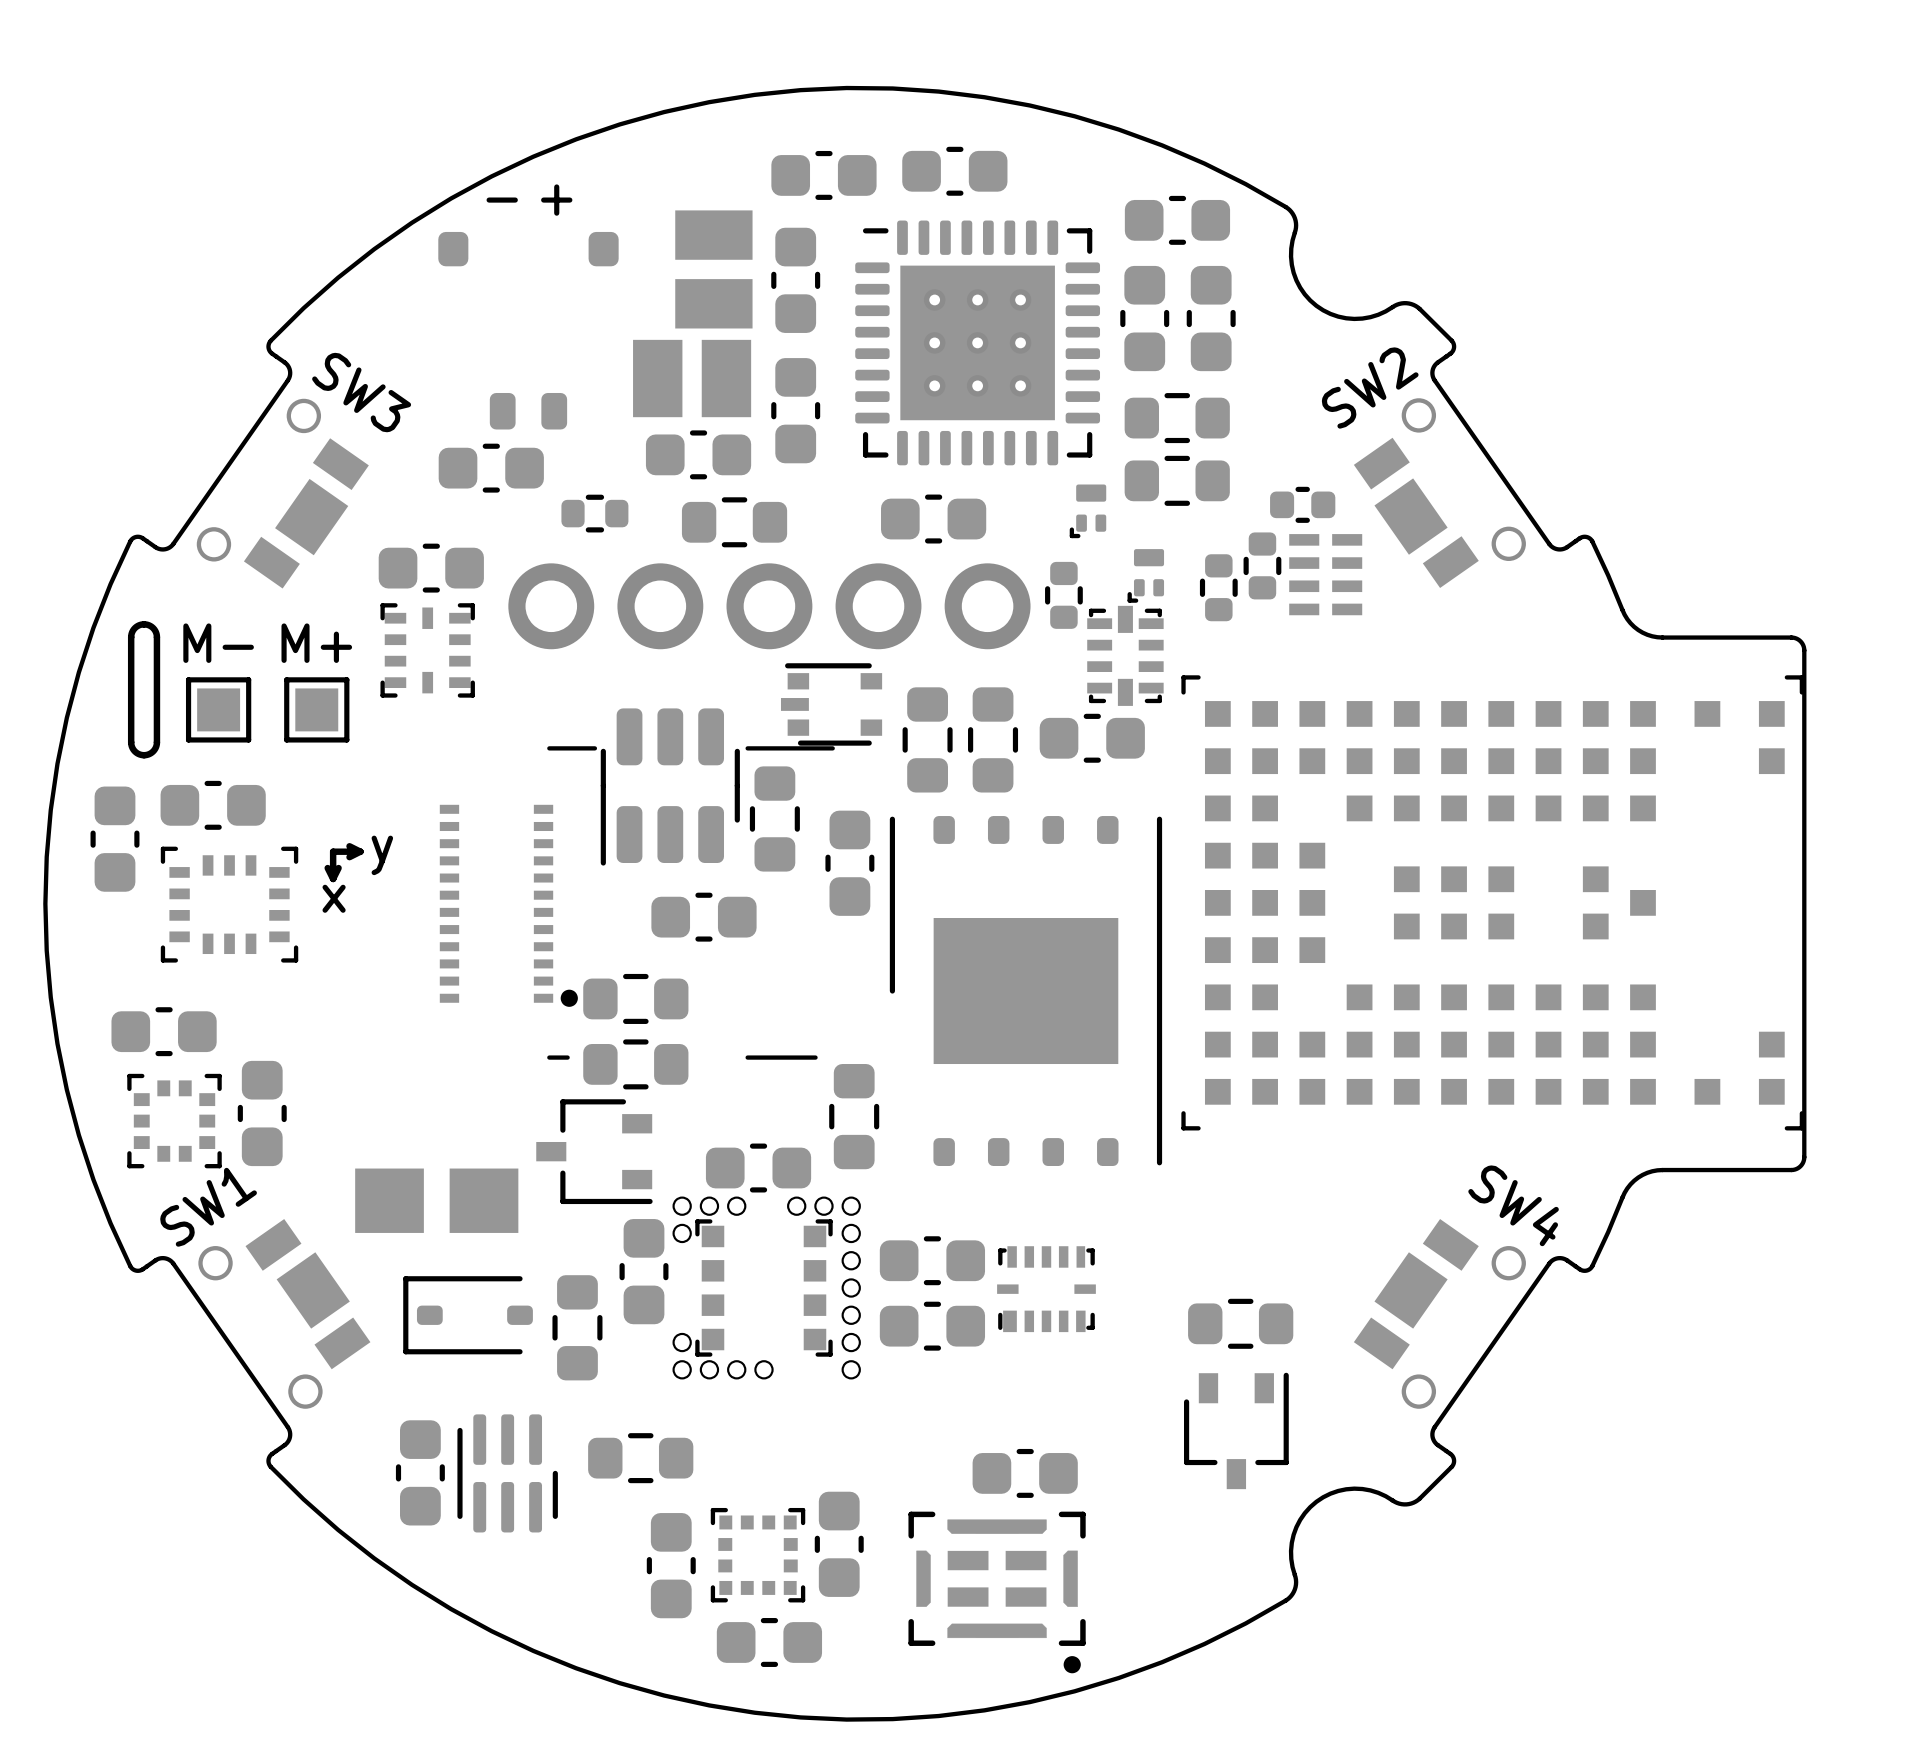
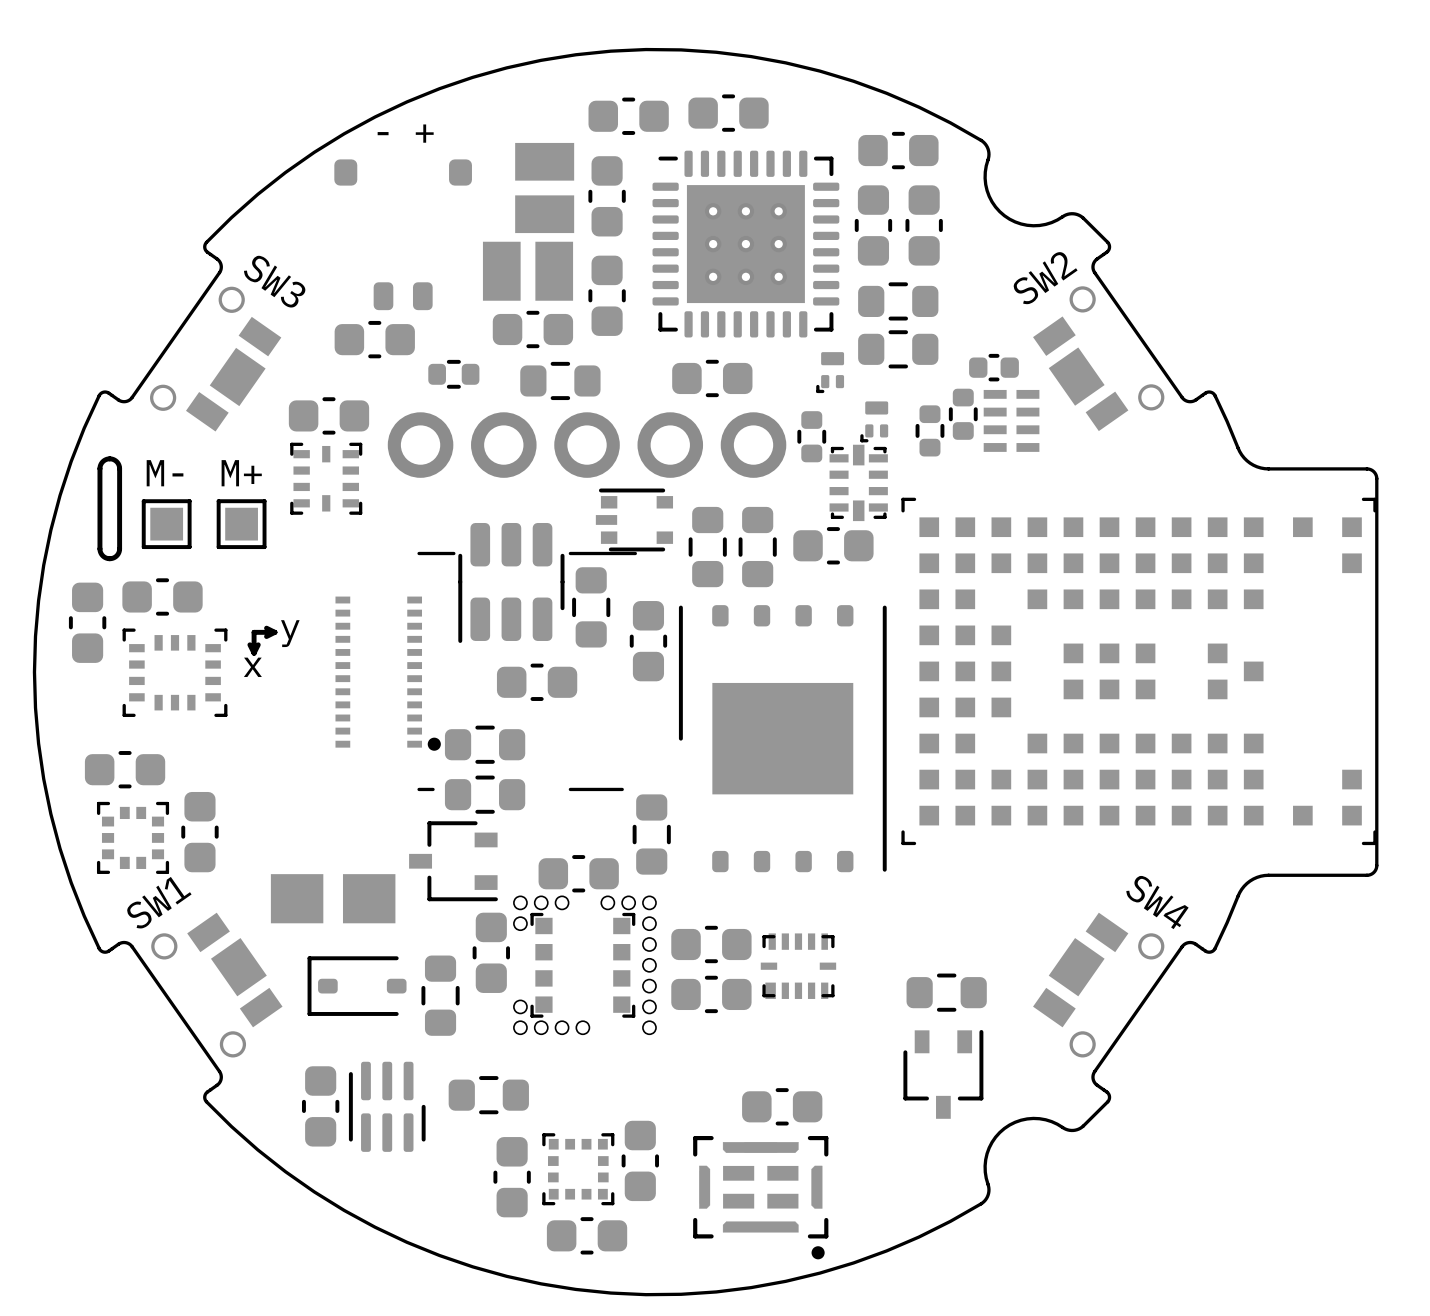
part footprint: [997, 1246, 1096, 1333] -> [760, 933, 837, 999]

